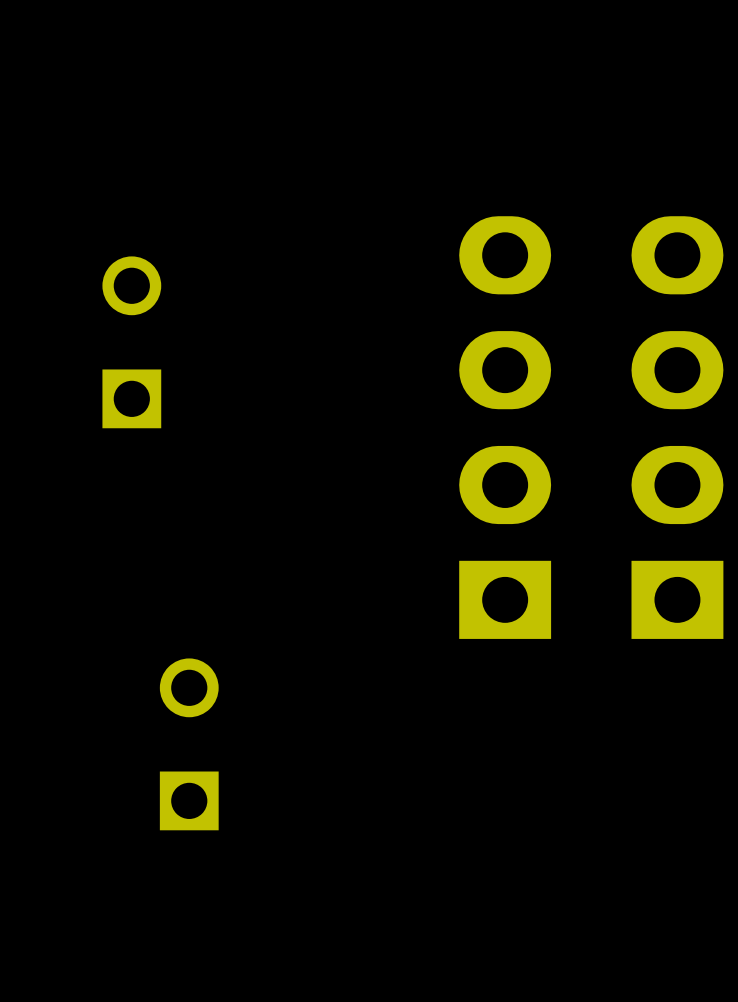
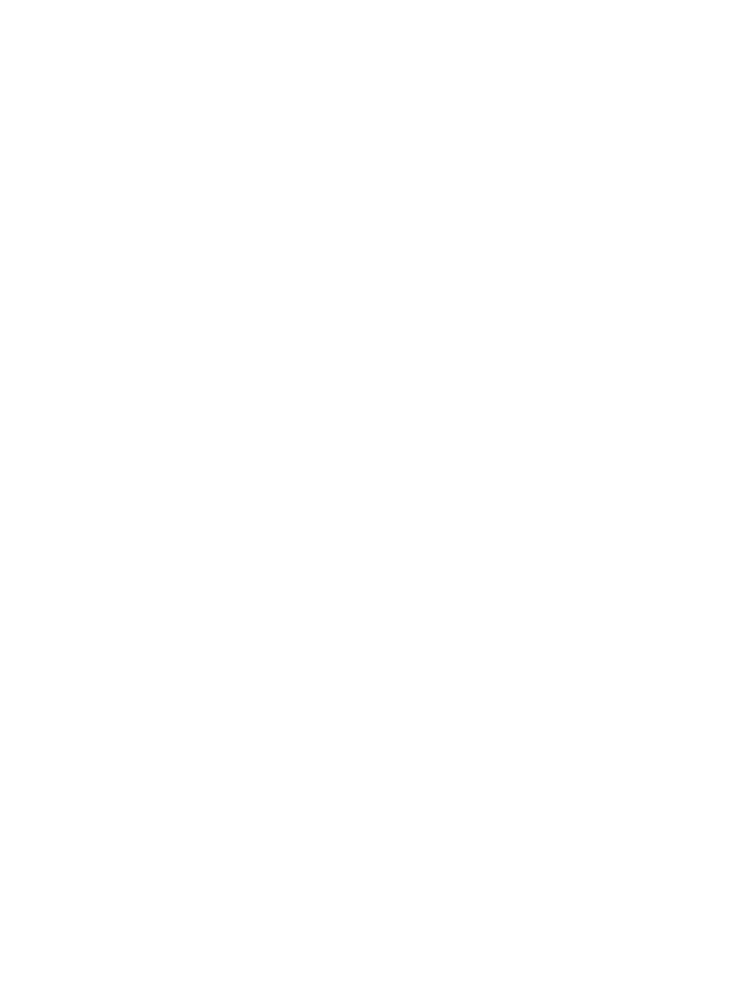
part: (131, 342) -> none
part: (505, 427) -> none
part: (677, 427) -> none
part: (189, 744) -> none

